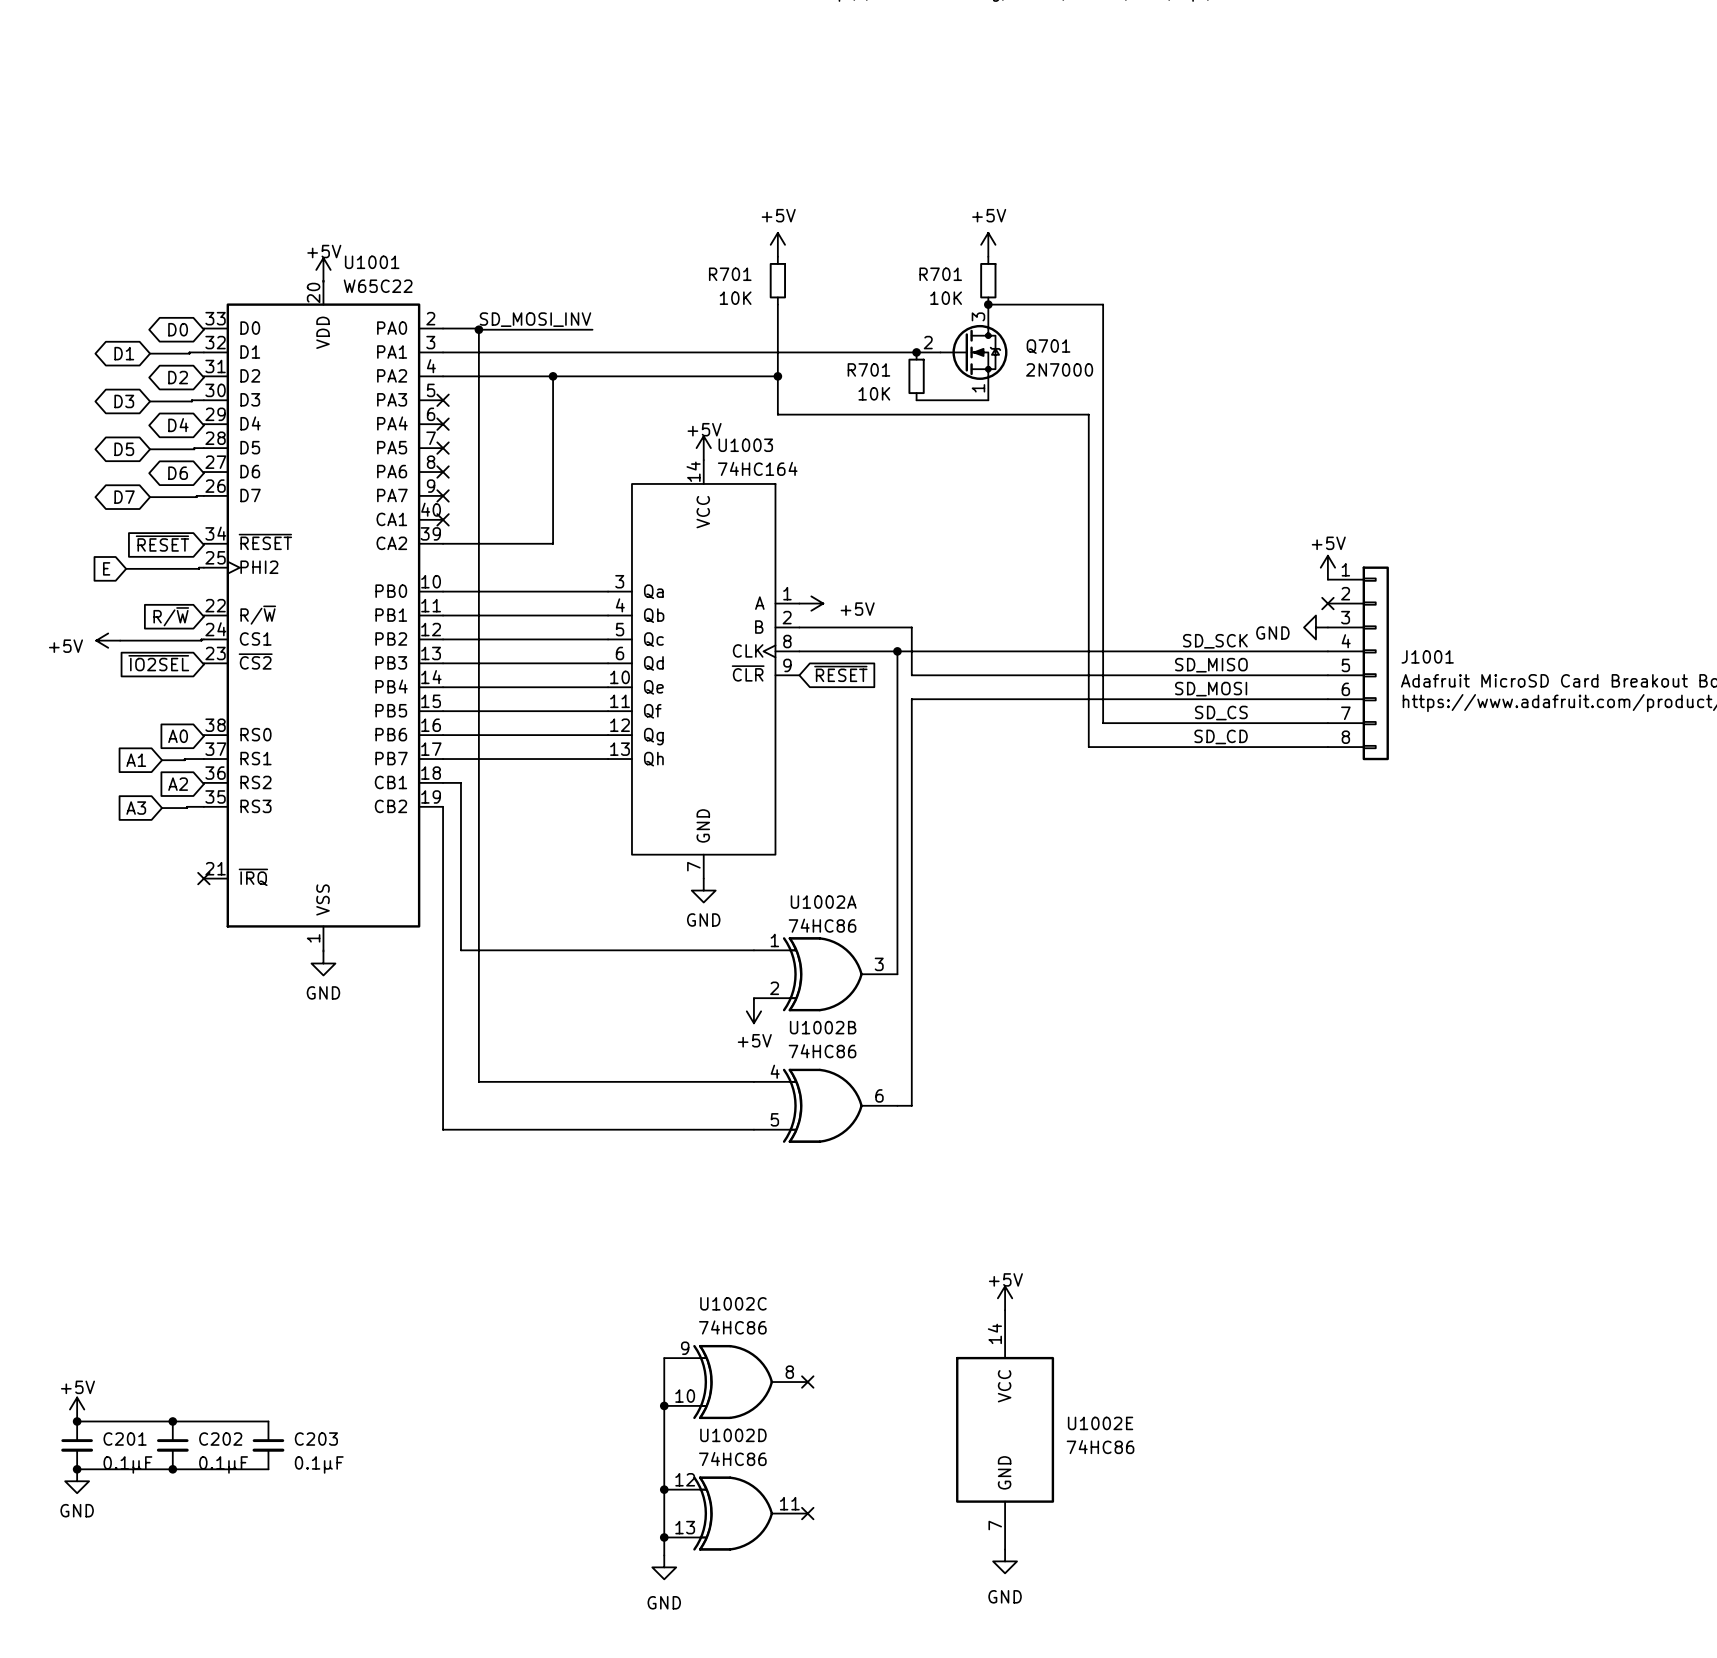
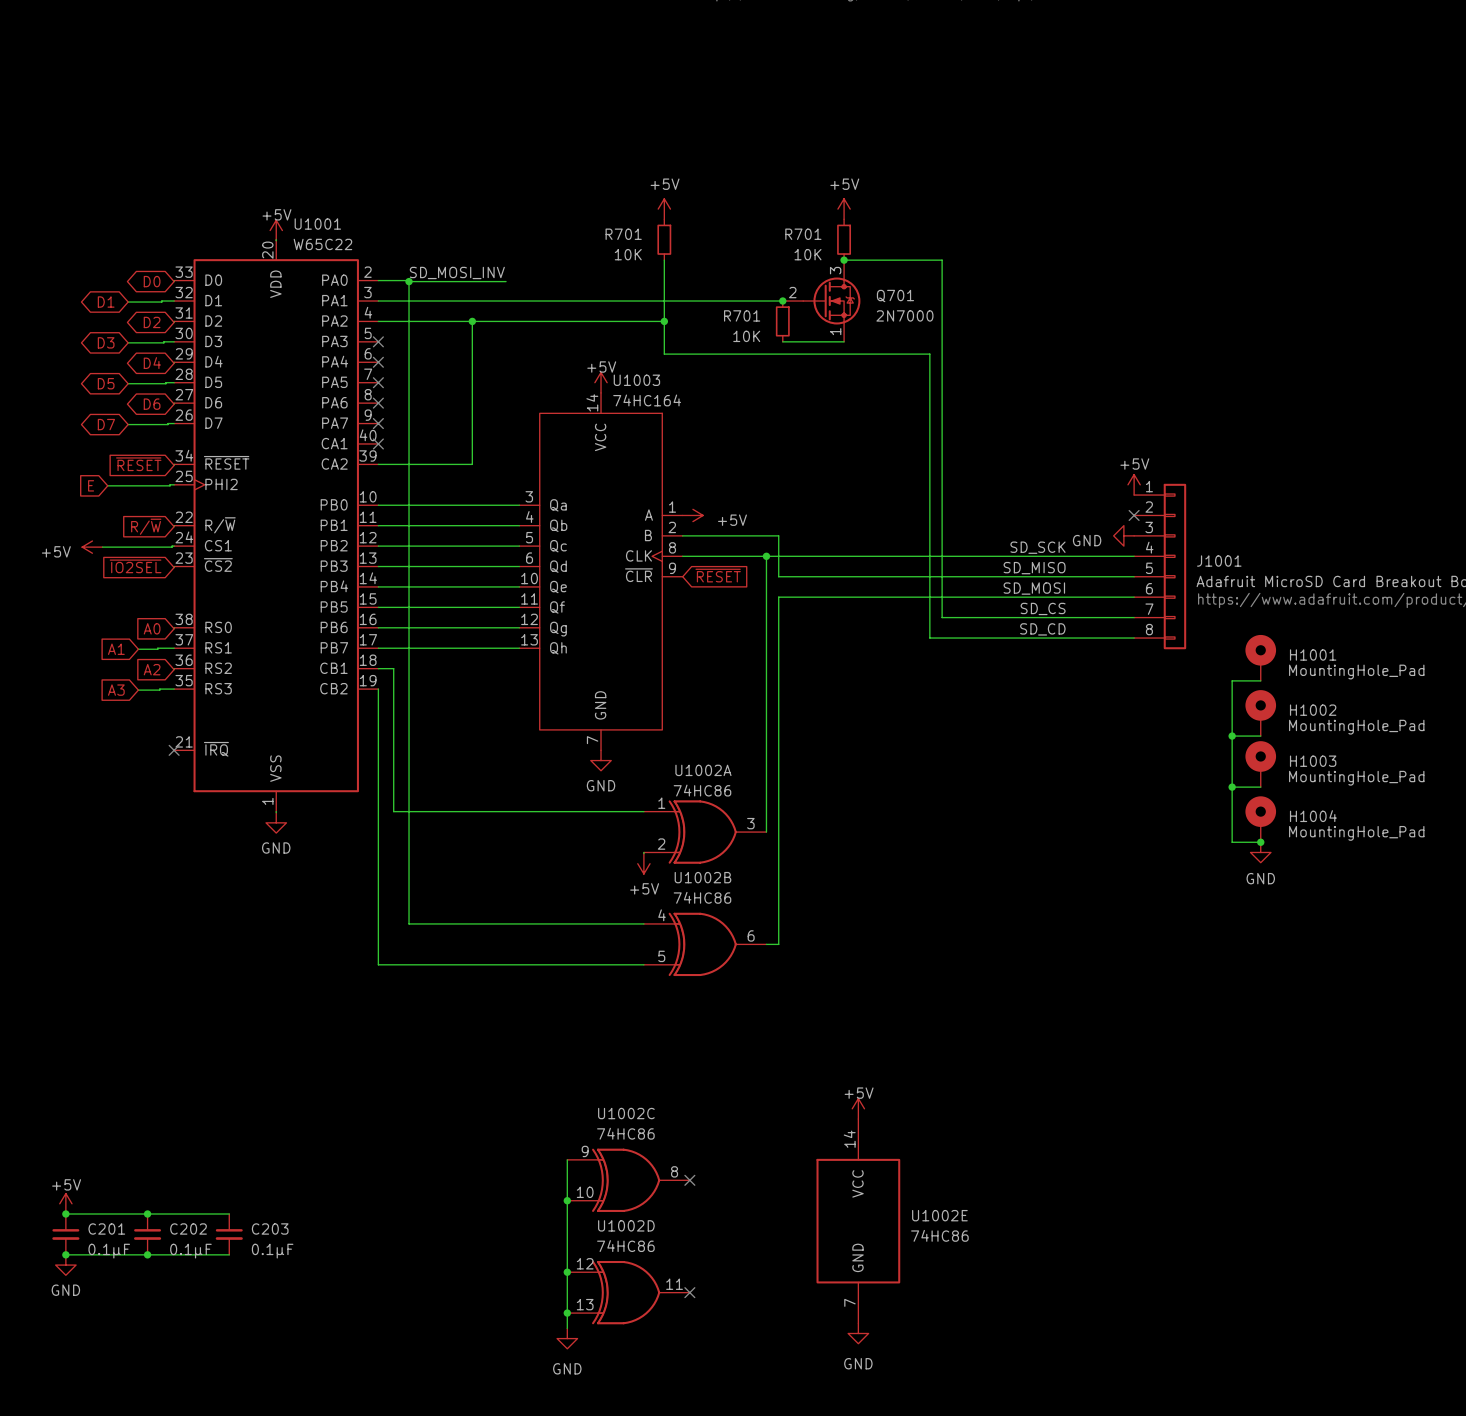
H1001: none -> MountingHole_Pad (1260, 657)
wire: none -> (1260, 680) (1232, 680) (1232, 842) (1260, 842)
H1002: none -> MountingHole_Pad (1260, 713)
wire: none -> (1232, 736) (1260, 736)
junction: none -> (1232, 736)
H1003: none -> MountingHole_Pad (1260, 764)
wire: none -> (1232, 787) (1260, 787)
junction: none -> (1232, 787)
H1004: none -> MountingHole_Pad (1260, 819)
junction: none -> (1260, 842)
power symbol: none -> GND (1260, 852)

